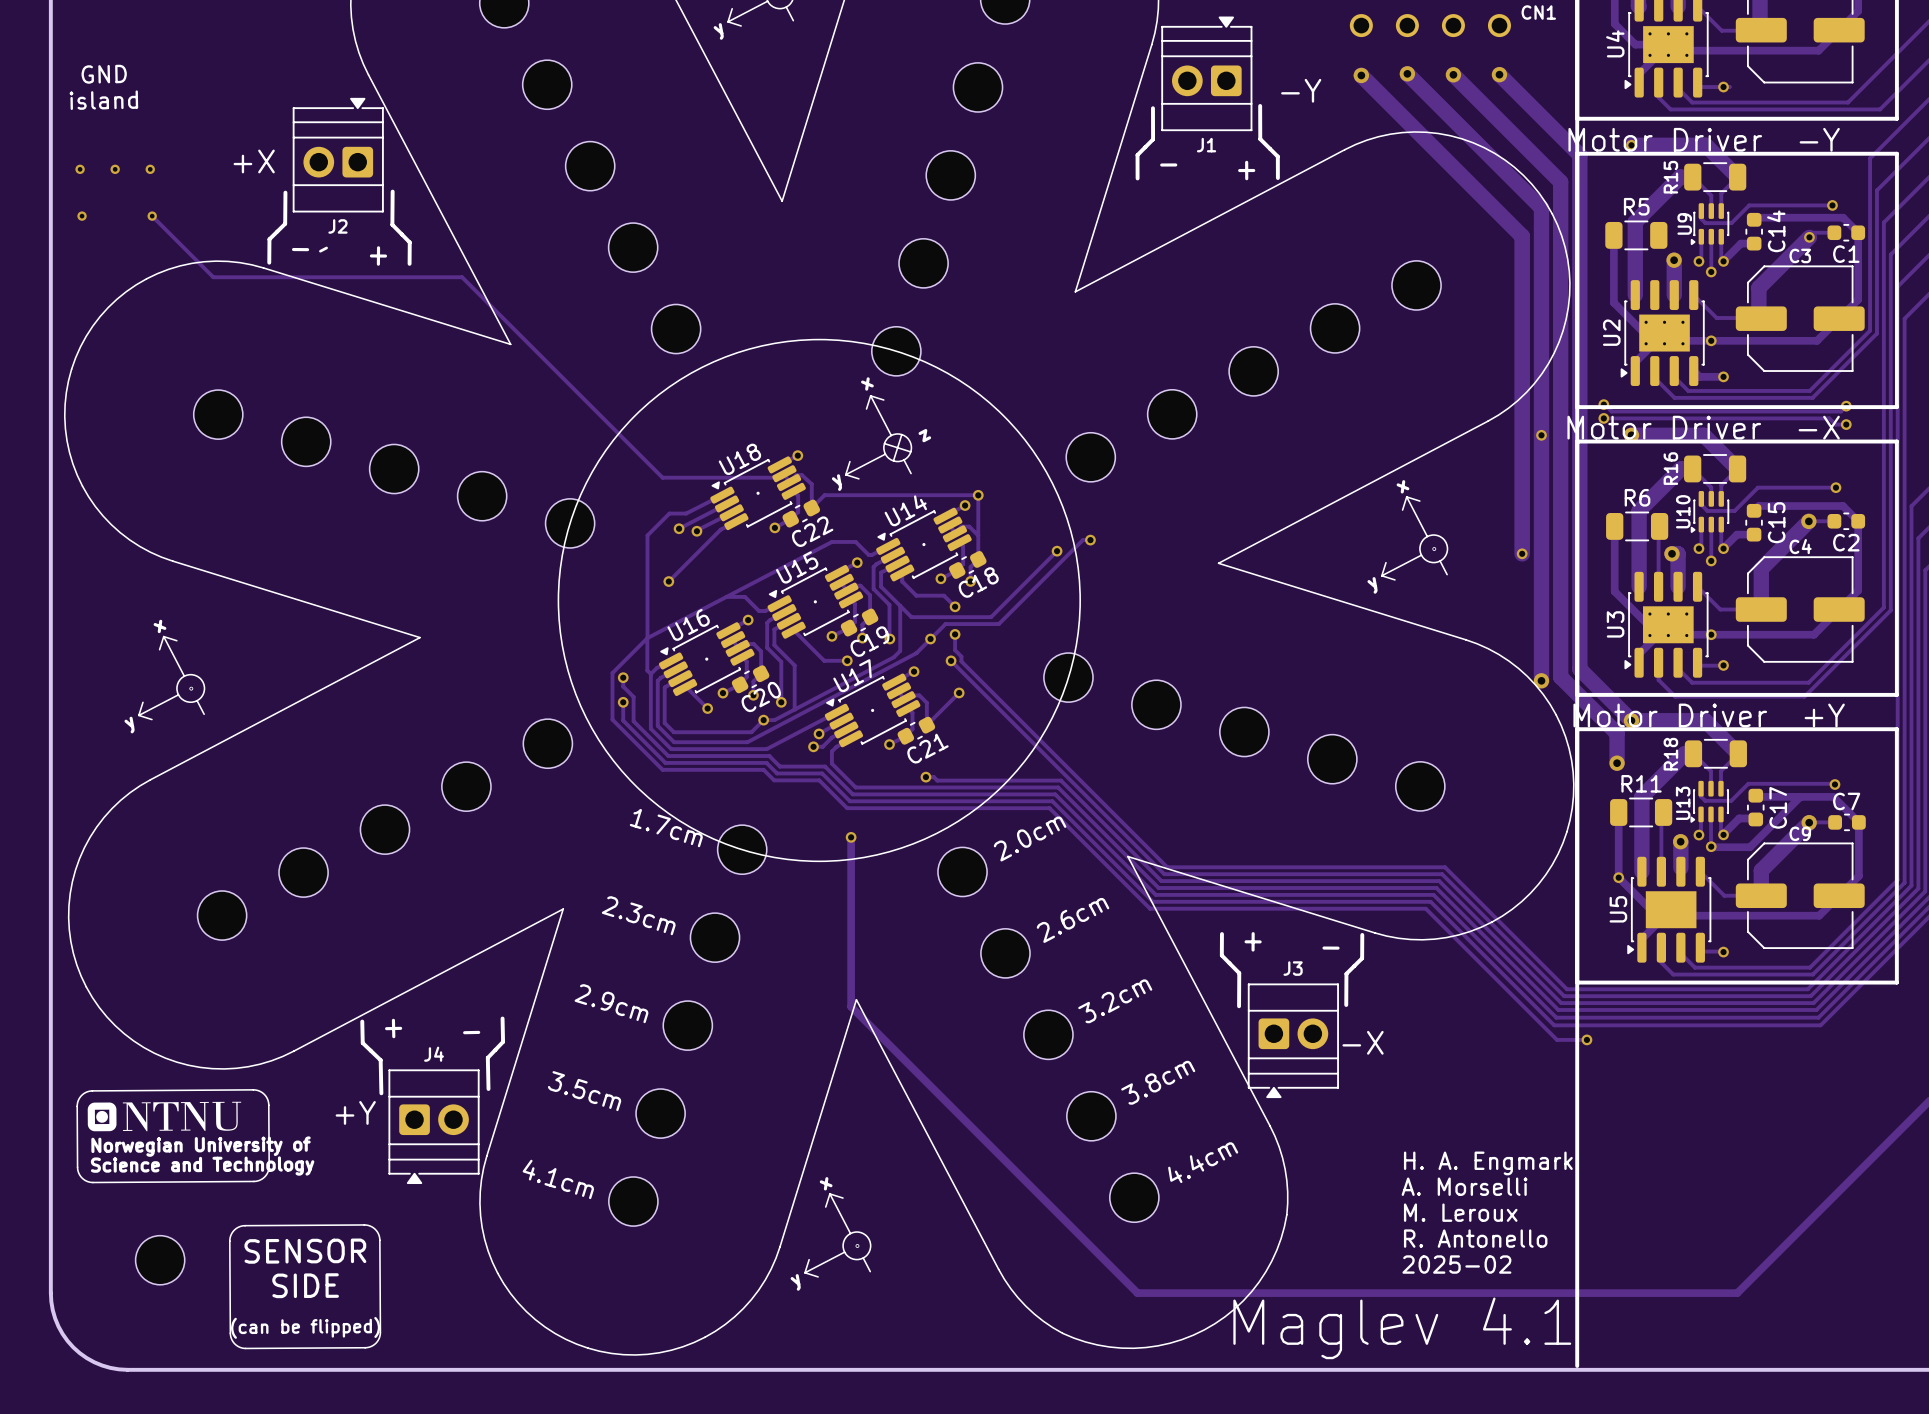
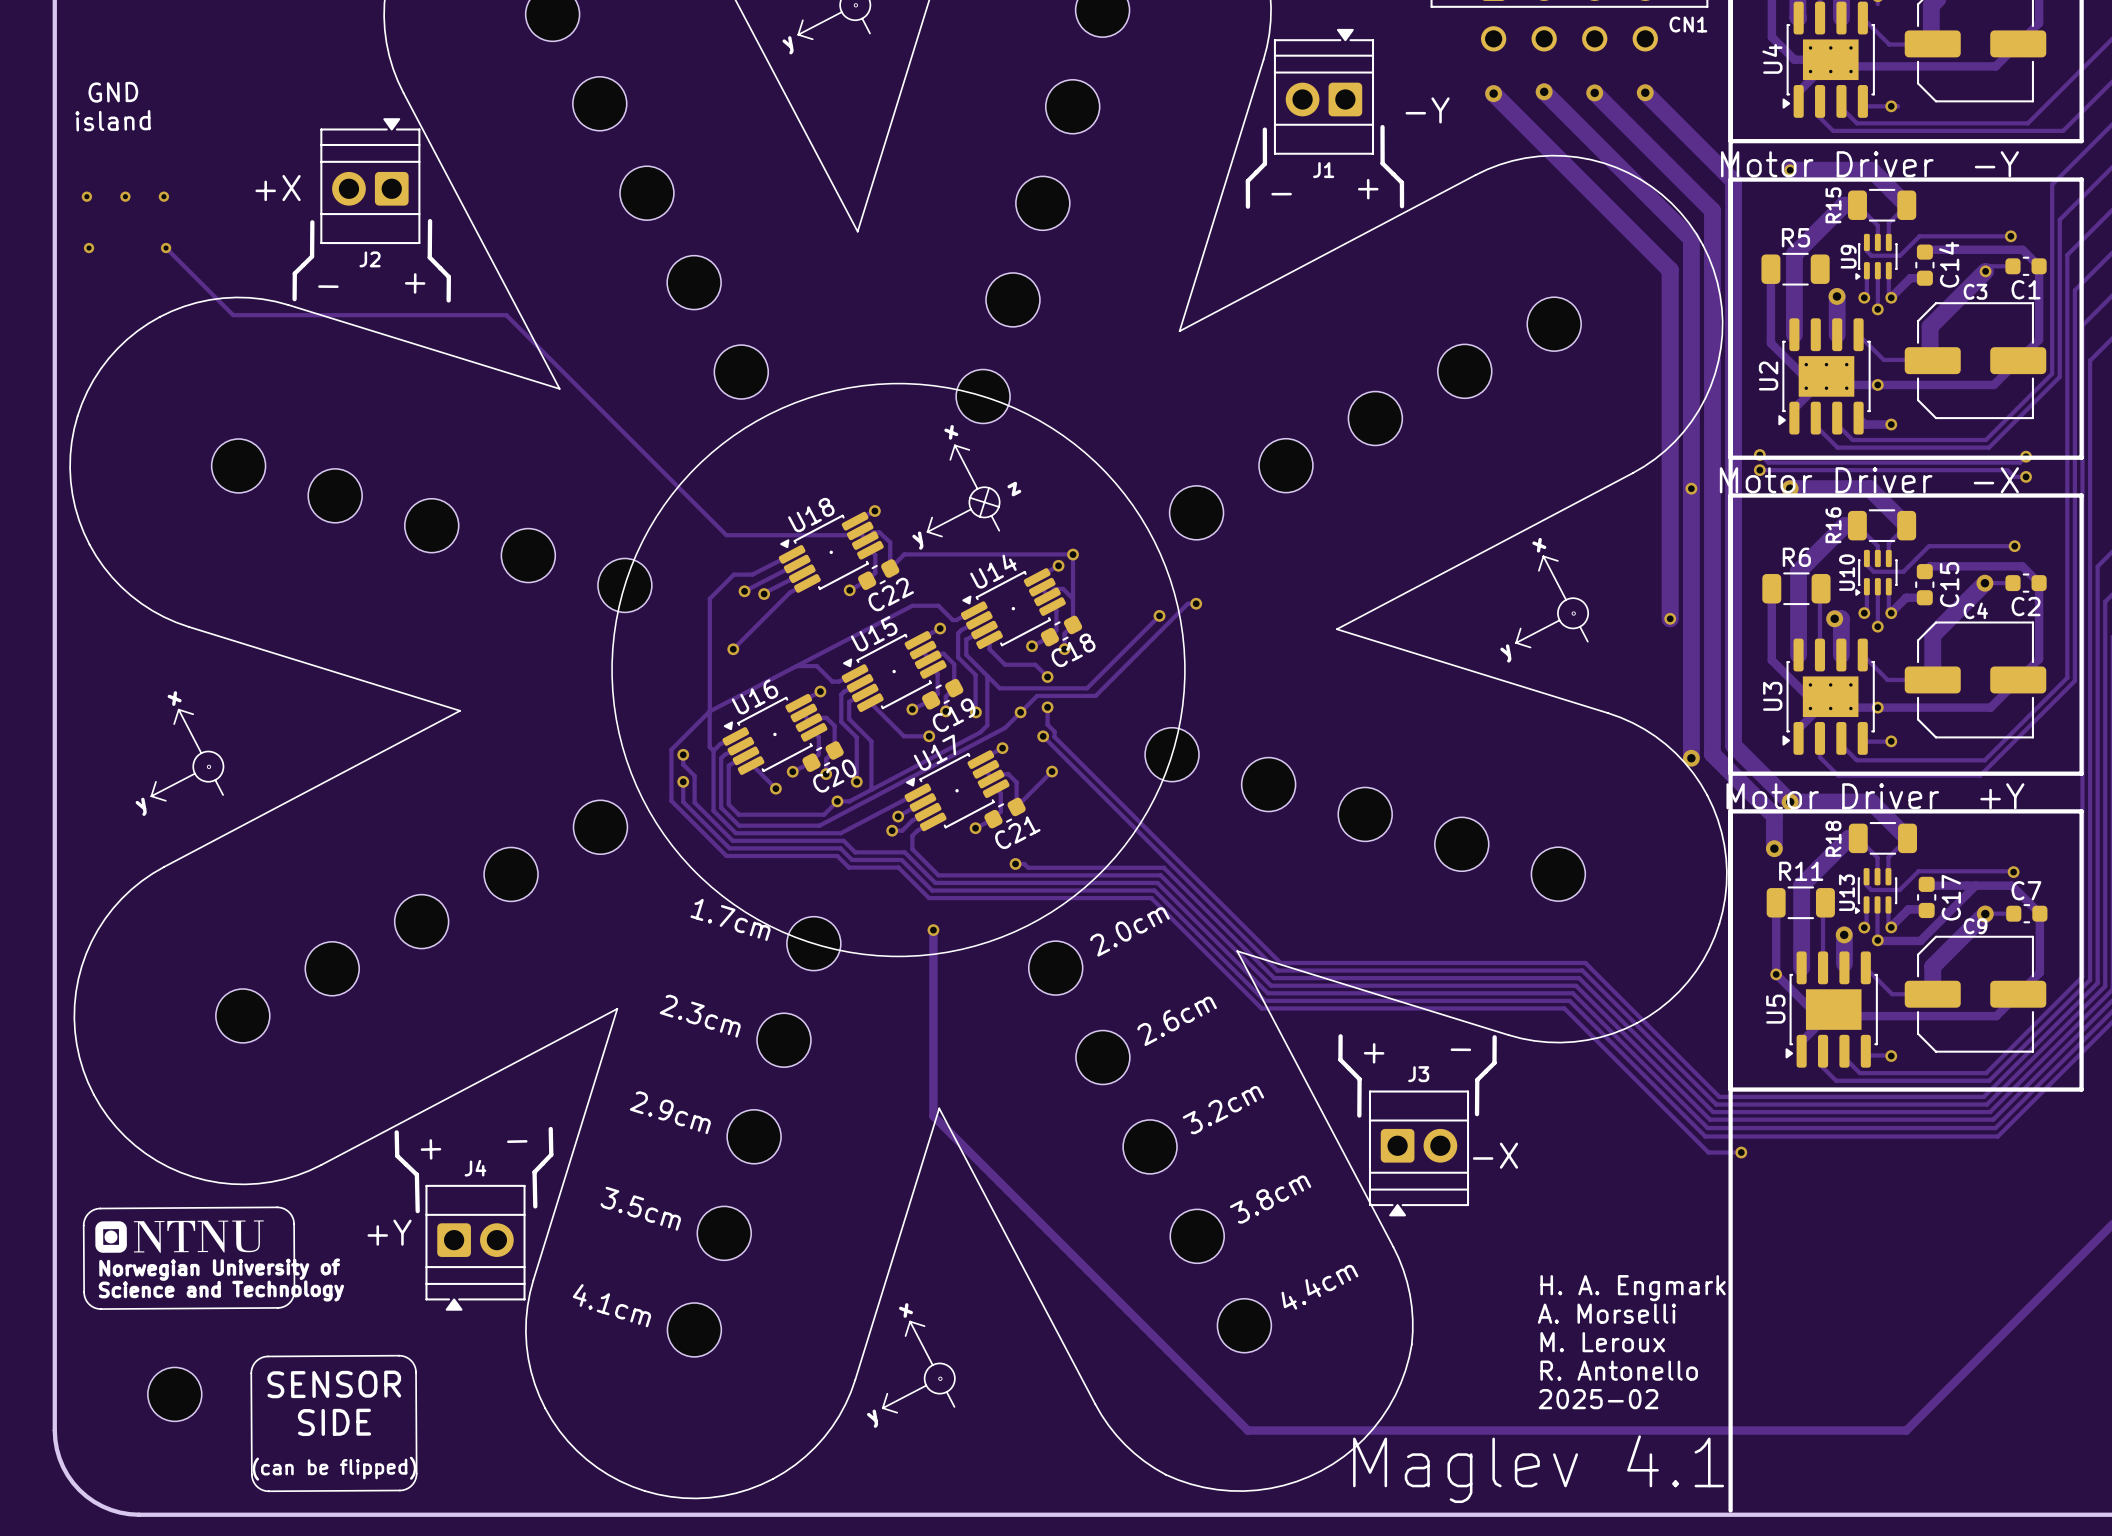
text rotation: 0° (1168, 164) -> 0° clockwise (1281, 194)
text rotation: 0° (1246, 170) -> 0° counterclockwise (1368, 189)
text rotation: 0° (300, 249) -> 0° counterclockwise (328, 286)
text: _ (323, 249) -> none
text rotation: 0° (378, 256) -> 0° clockwise (415, 283)
text rotation: 0° (1253, 941) -> 0° counterclockwise (1374, 1053)
text rotation: 0° (1331, 948) -> 0° clockwise (1460, 1049)
text rotation: 0° (393, 1028) -> 0° clockwise (430, 1149)
text rotation: 0° (471, 1032) -> 0° counterclockwise (517, 1141)

